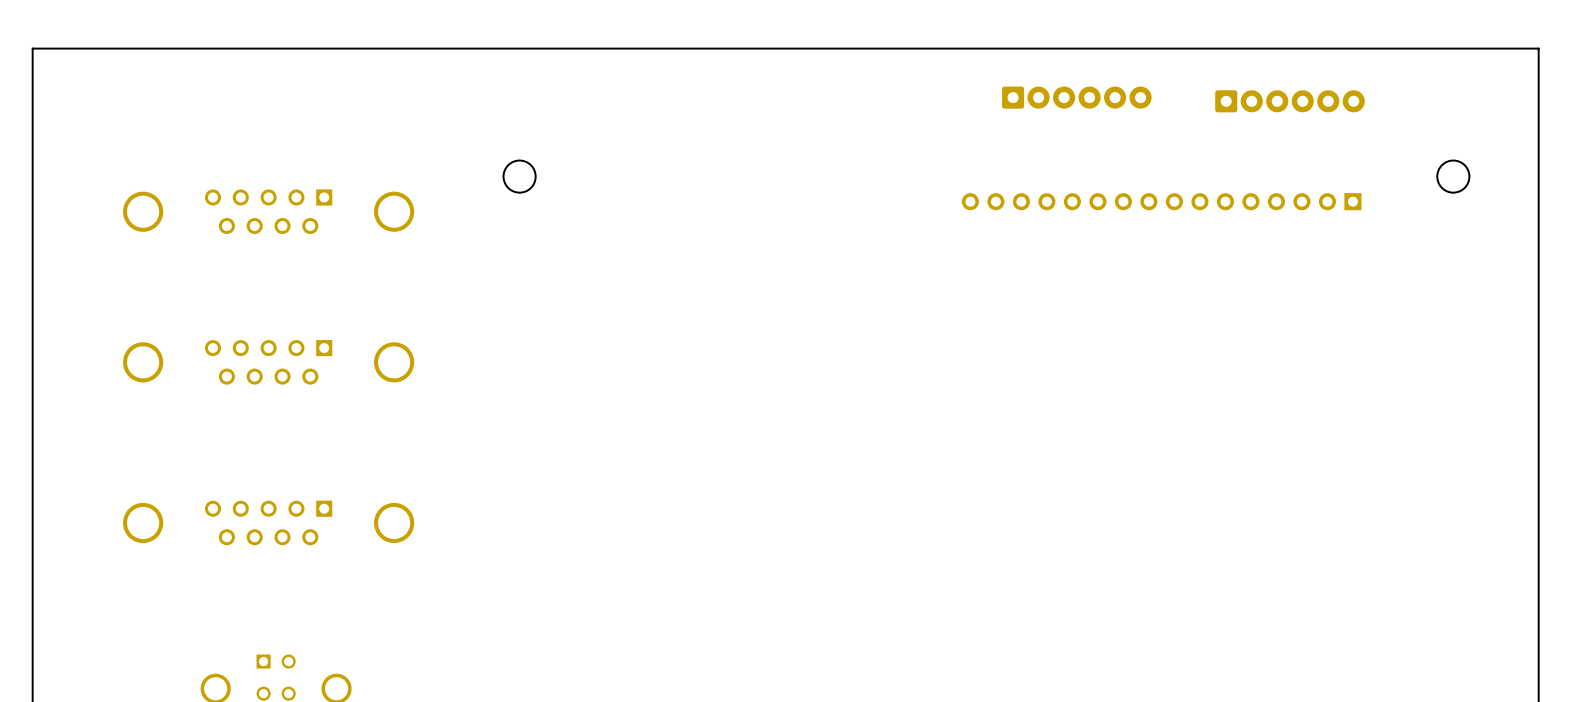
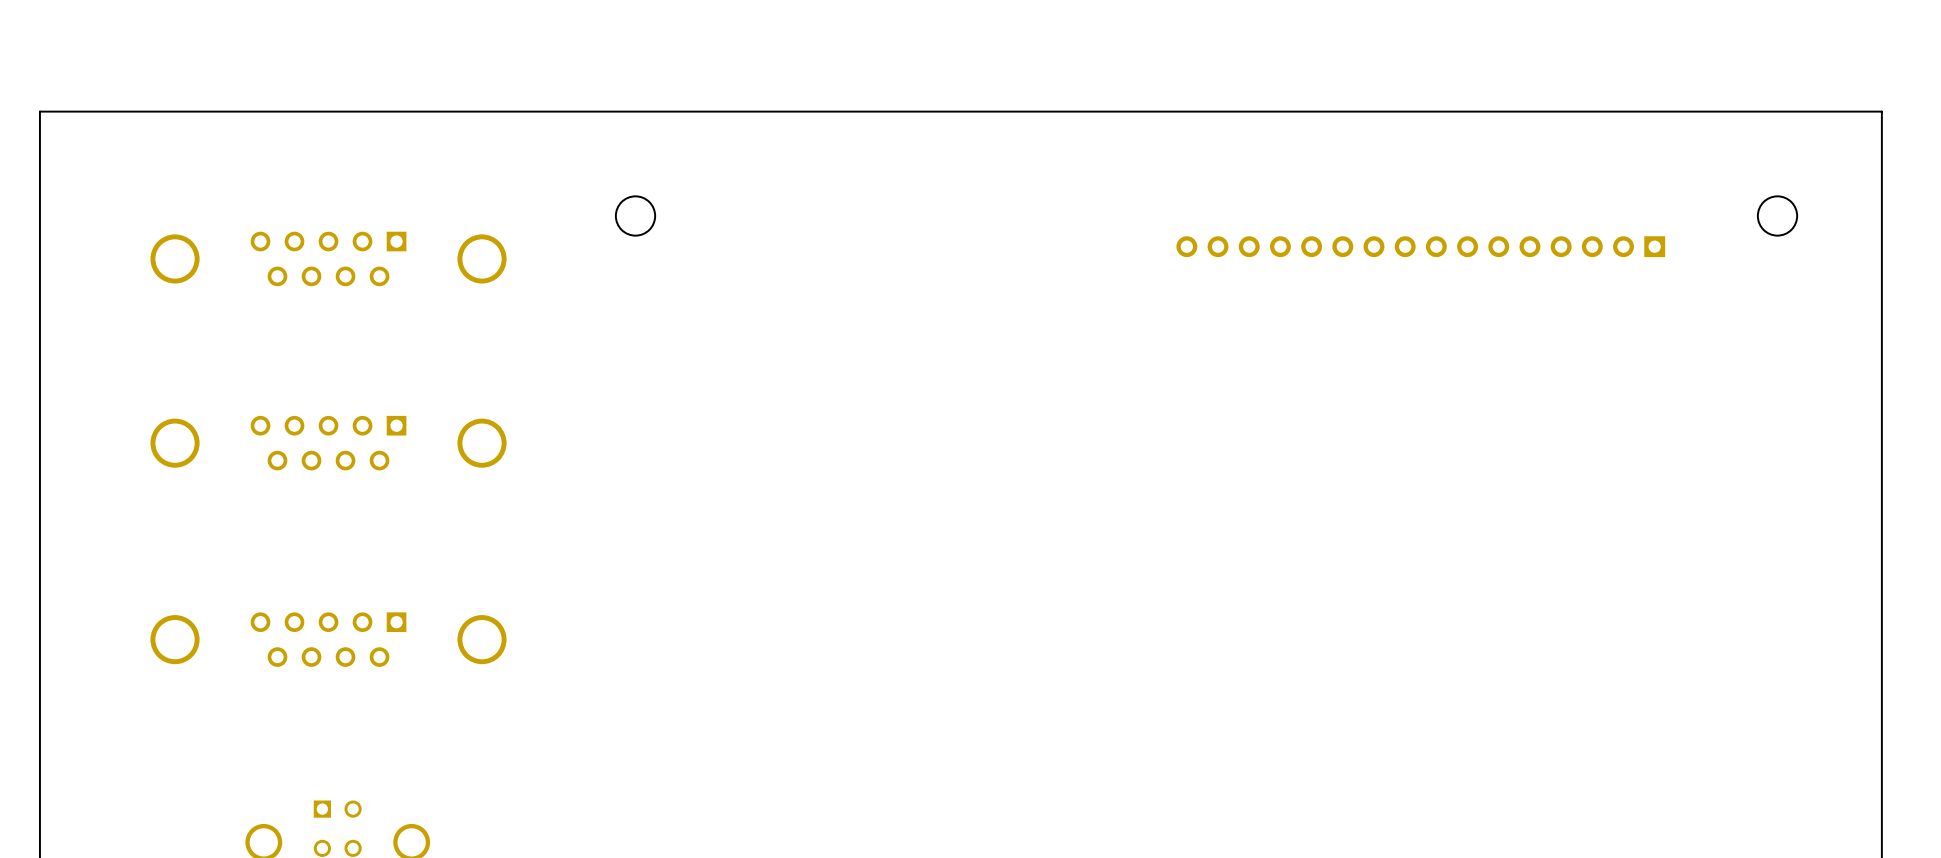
board edge: (1538, 91) (1538, 48) (32, 48) (32, 91) -> (1881, 111) (39, 111)
part: (1076, 97) -> none
part: (1289, 101) -> none

